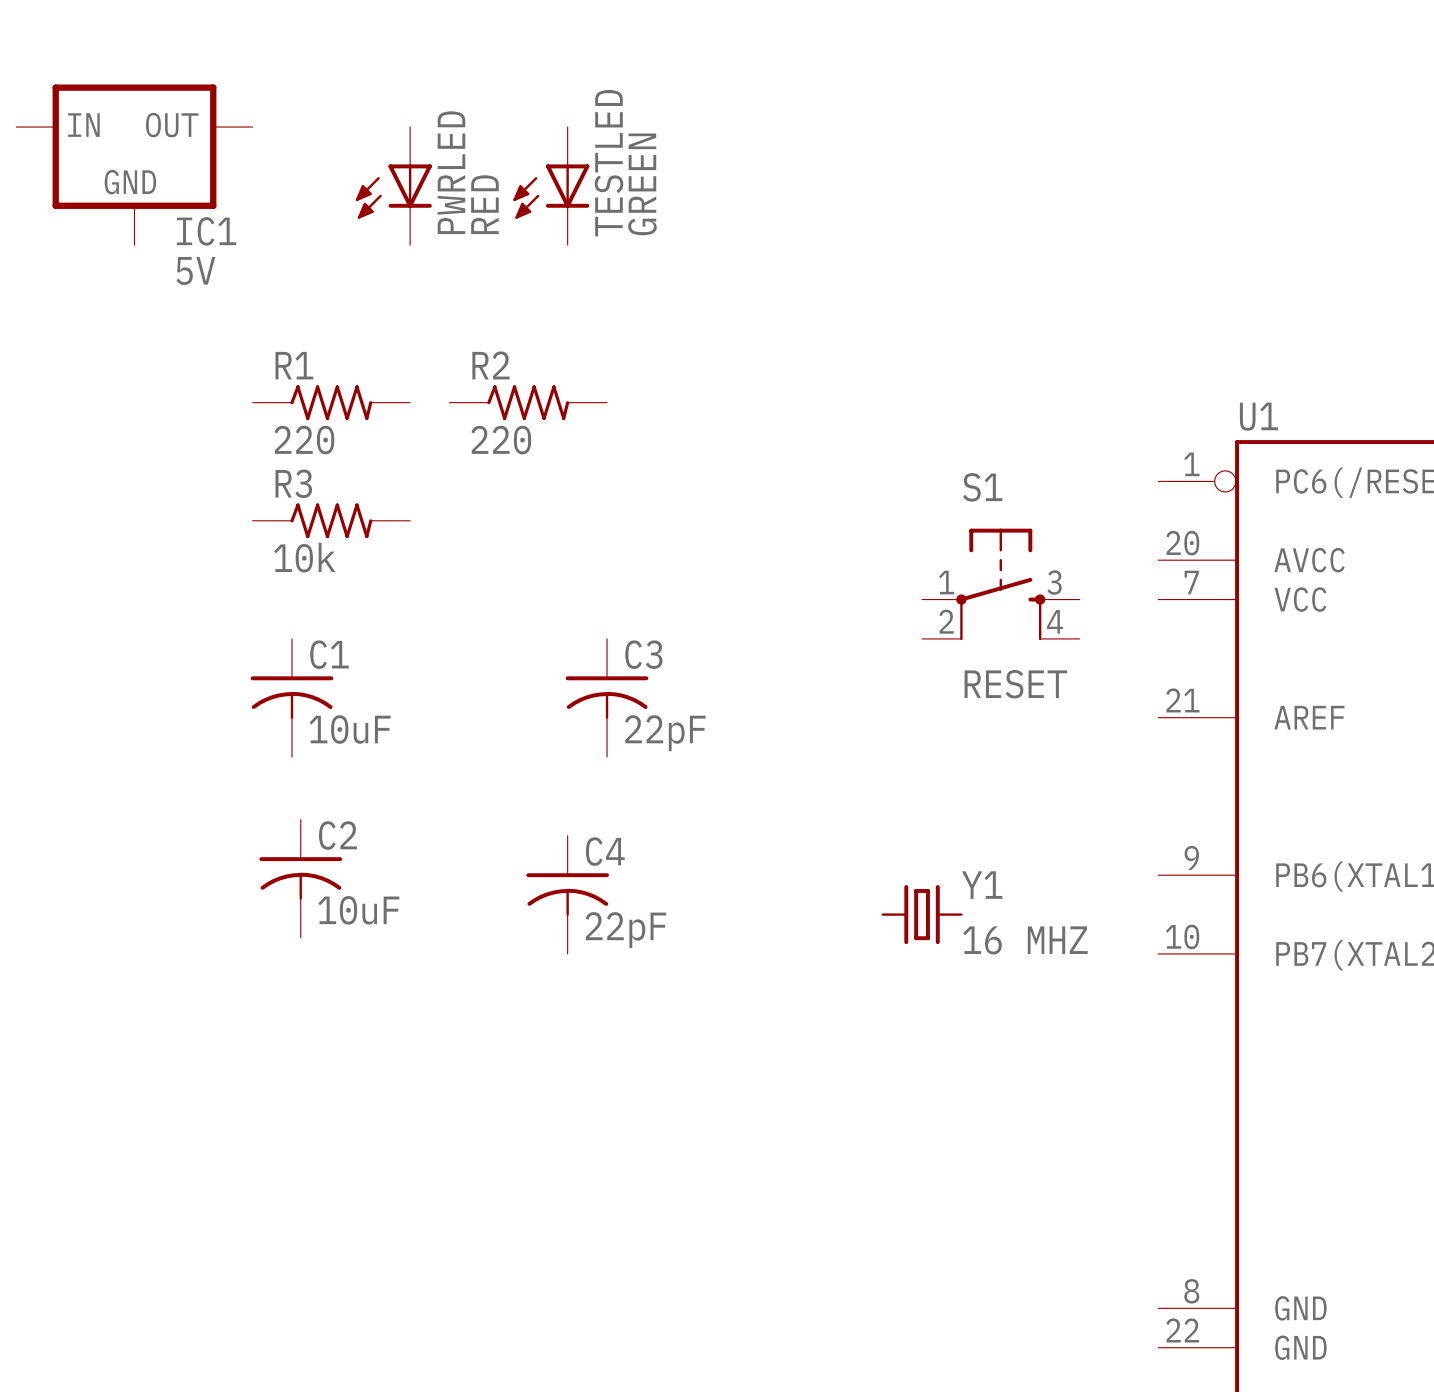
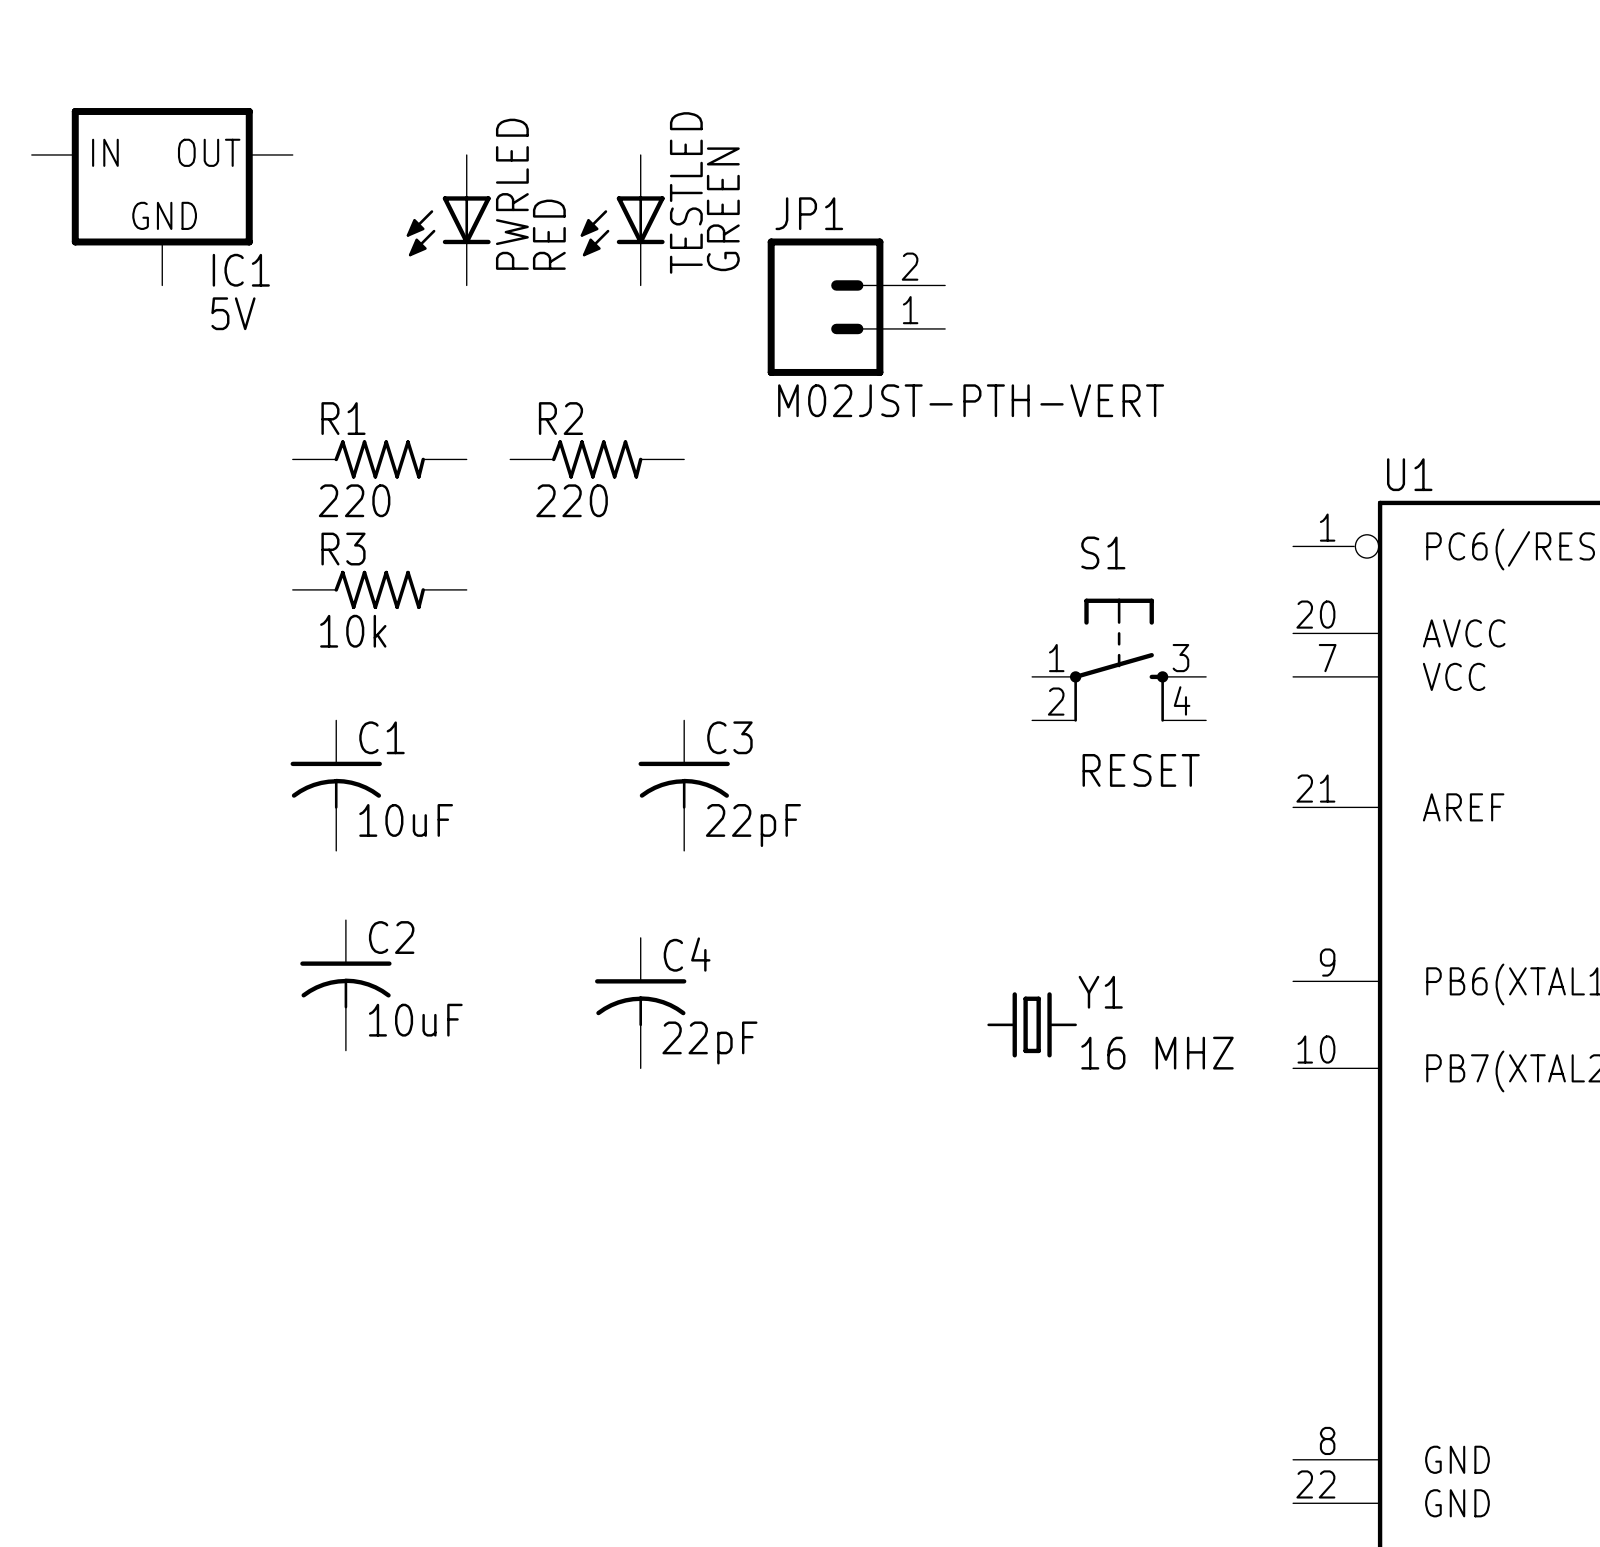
JP1: none -> M02JST-PTH-VERT (856, 307)

